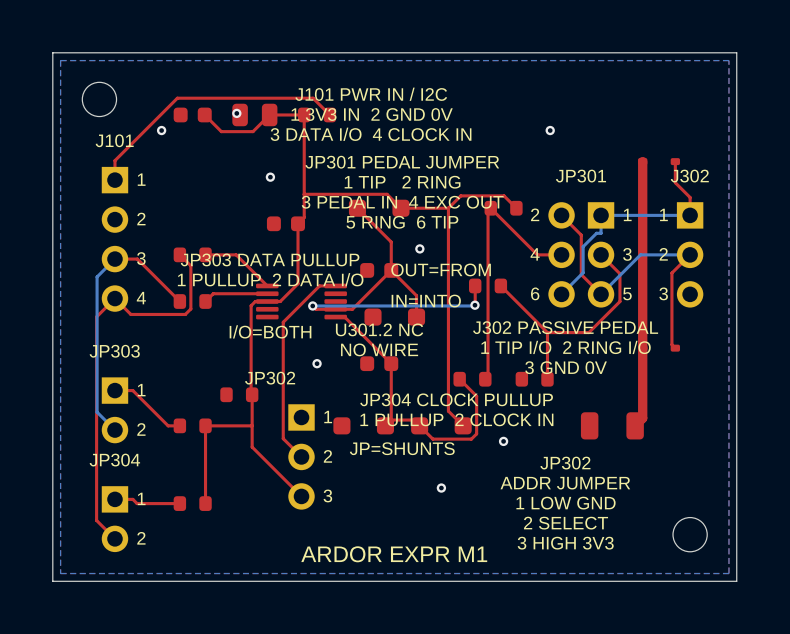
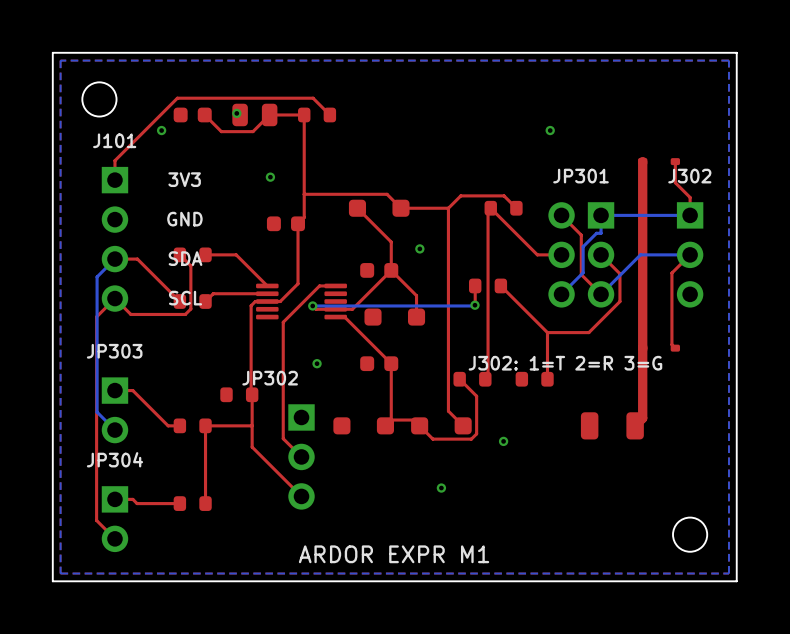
text: J101 PWR IN / I2C (371, 94) -> none
text: 1 3V3 IN 2 GND 0V (372, 114) -> none
text: 3 DATA I/O 4 CLOCK IN (371, 134) -> none
text: JP301 PEDAL JUMPER (402, 162) -> none
text: 1 (141, 179) -> none
text: none -> 3V3 (184, 179)
text: 1 TIP 2 RING (402, 182) -> none
text: 3 PEDAL IN 4 EXC OUT (402, 202) -> none
text: 2 (535, 214) -> none
text: 1 (627, 214) -> none
text: 1 (663, 214) -> none
text: 2 (141, 219) -> none
text: none -> GND (184, 219)
text: 5 RING 6 TIP (402, 222) -> none
text: 4 (535, 254) -> none
text: 3 (627, 254) -> none
text: 2 (663, 254) -> none
text: 3 (141, 258) -> none
text: none -> SDA (185, 258)
text: JP303 DATA PULLUP (270, 259) -> none
text: OUT=FROM (441, 269) -> none
text: 1 PULLUP 2 DATA I/O (270, 279) -> none
text: 6 (535, 293) -> none
text: 5 (627, 293) -> none
text: 3 (663, 293) -> none
text: 4 (141, 298) -> none
text: none -> SCL (185, 298)
text: IN=INTO (426, 301) -> none
text: J302 PASSIVE PEDAL (565, 327) -> none
text: U301.2 NC (379, 329) -> none
text: I/O=BOTH (270, 331) -> none
text: 1 TIP I/O 2 RING I/O (566, 347) -> none
text: NO WIRE (379, 349) -> none
text: 3 GND 0V (566, 367) -> J302: 1=T 2=R 3=G (565, 363)
text: 1 (141, 390) -> none
text: JP304 CLOCK PULLUP (456, 399) -> none
text: 1 (328, 417) -> none
text: 1 PULLUP 2 CLOCK IN (456, 419) -> none
text: 2 (141, 429) -> none
text: JP=SHUNTS (402, 448) -> none
text: 2 (327, 456) -> none
text: JP302 (565, 463) -> none
text: ADDR JUMPER (565, 483) -> none
text: 3 (327, 495) -> none
text: 1 (141, 498) -> none
text: 1 LOW GND (566, 503) -> none
text: 2 SELECT (566, 523) -> none
text: 2 (141, 538) -> none
text: 3 HIGH 3V3 (565, 543) -> none

